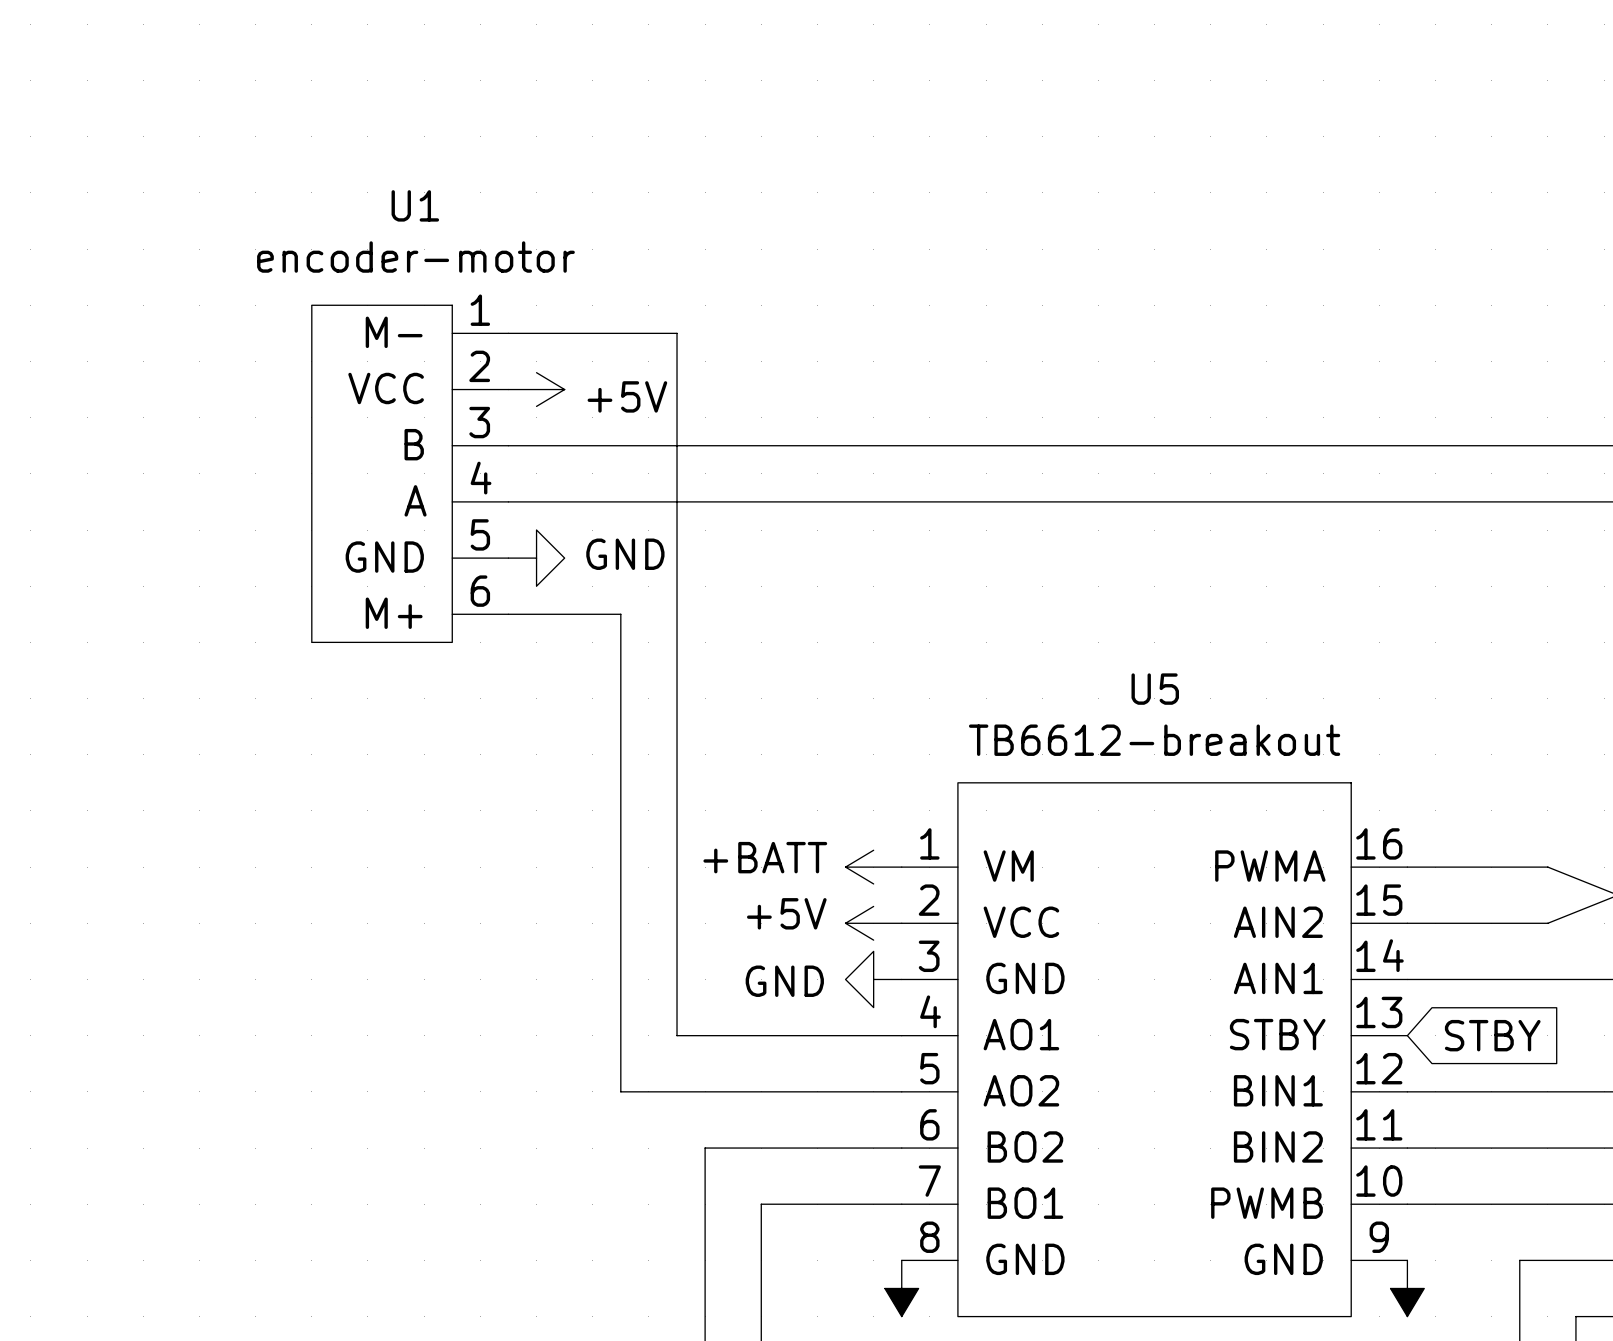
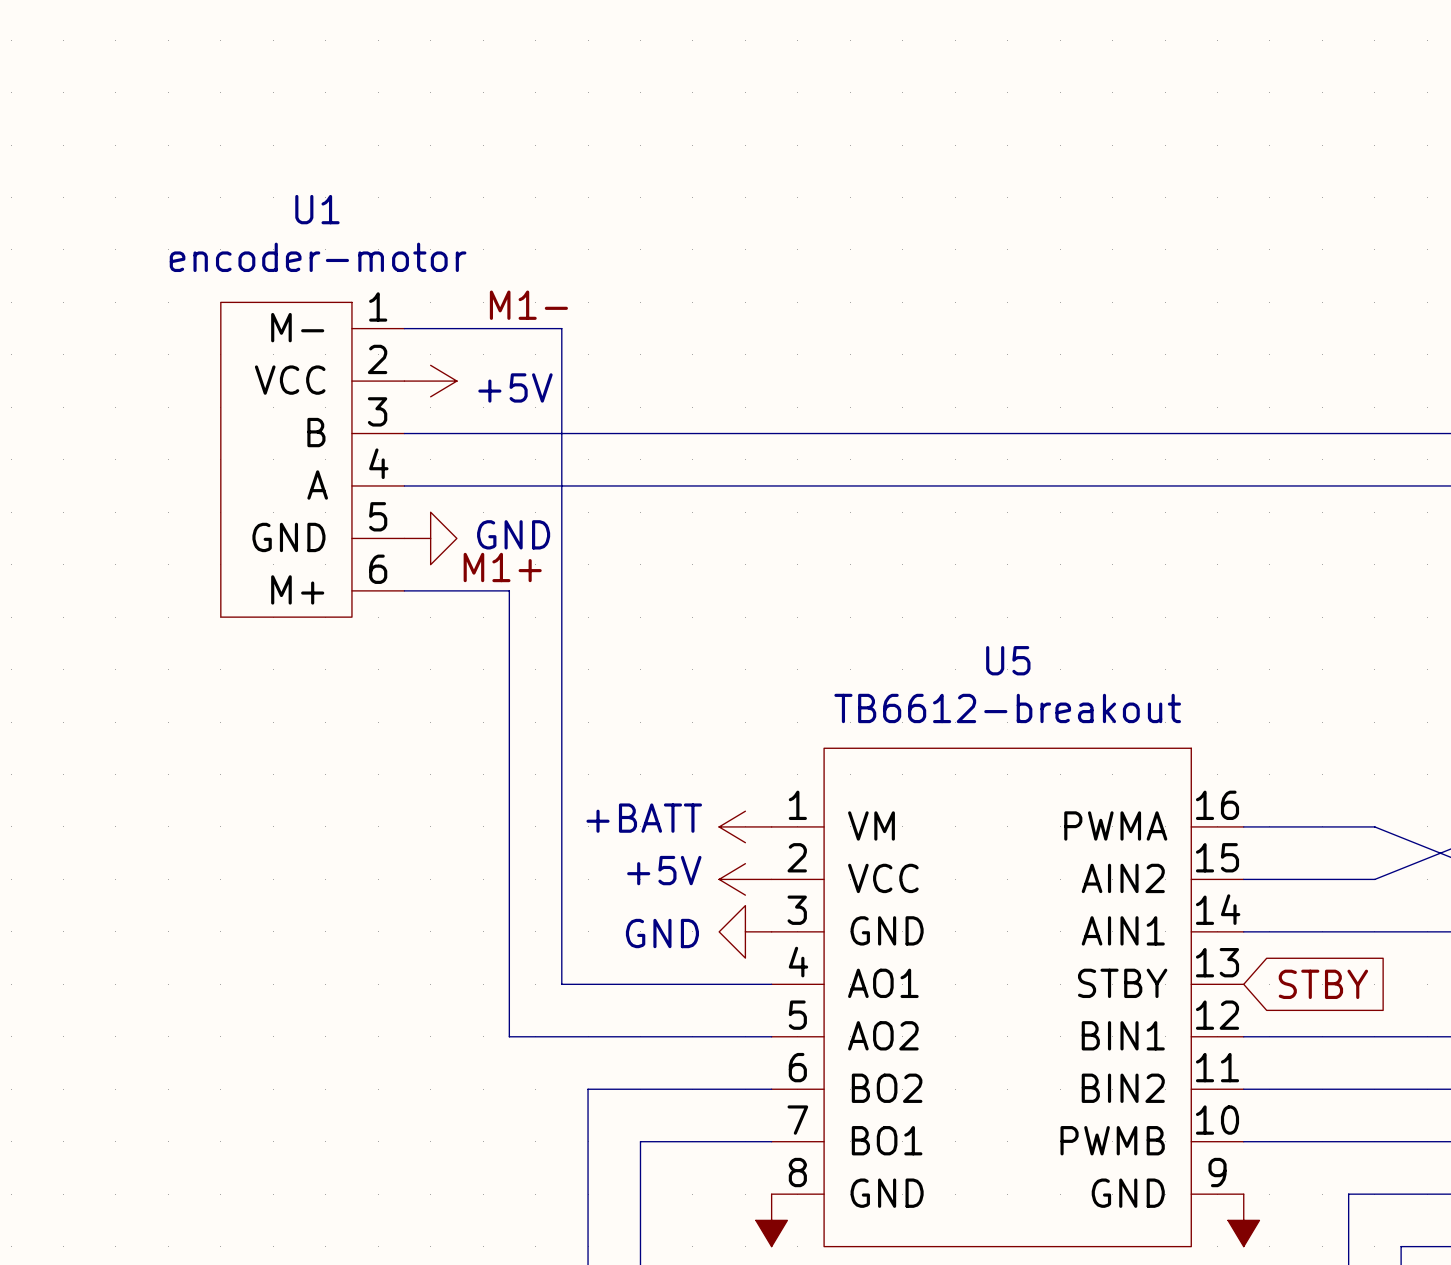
label: none -> M1- (528, 305)
label: none -> M1+ (502, 567)

